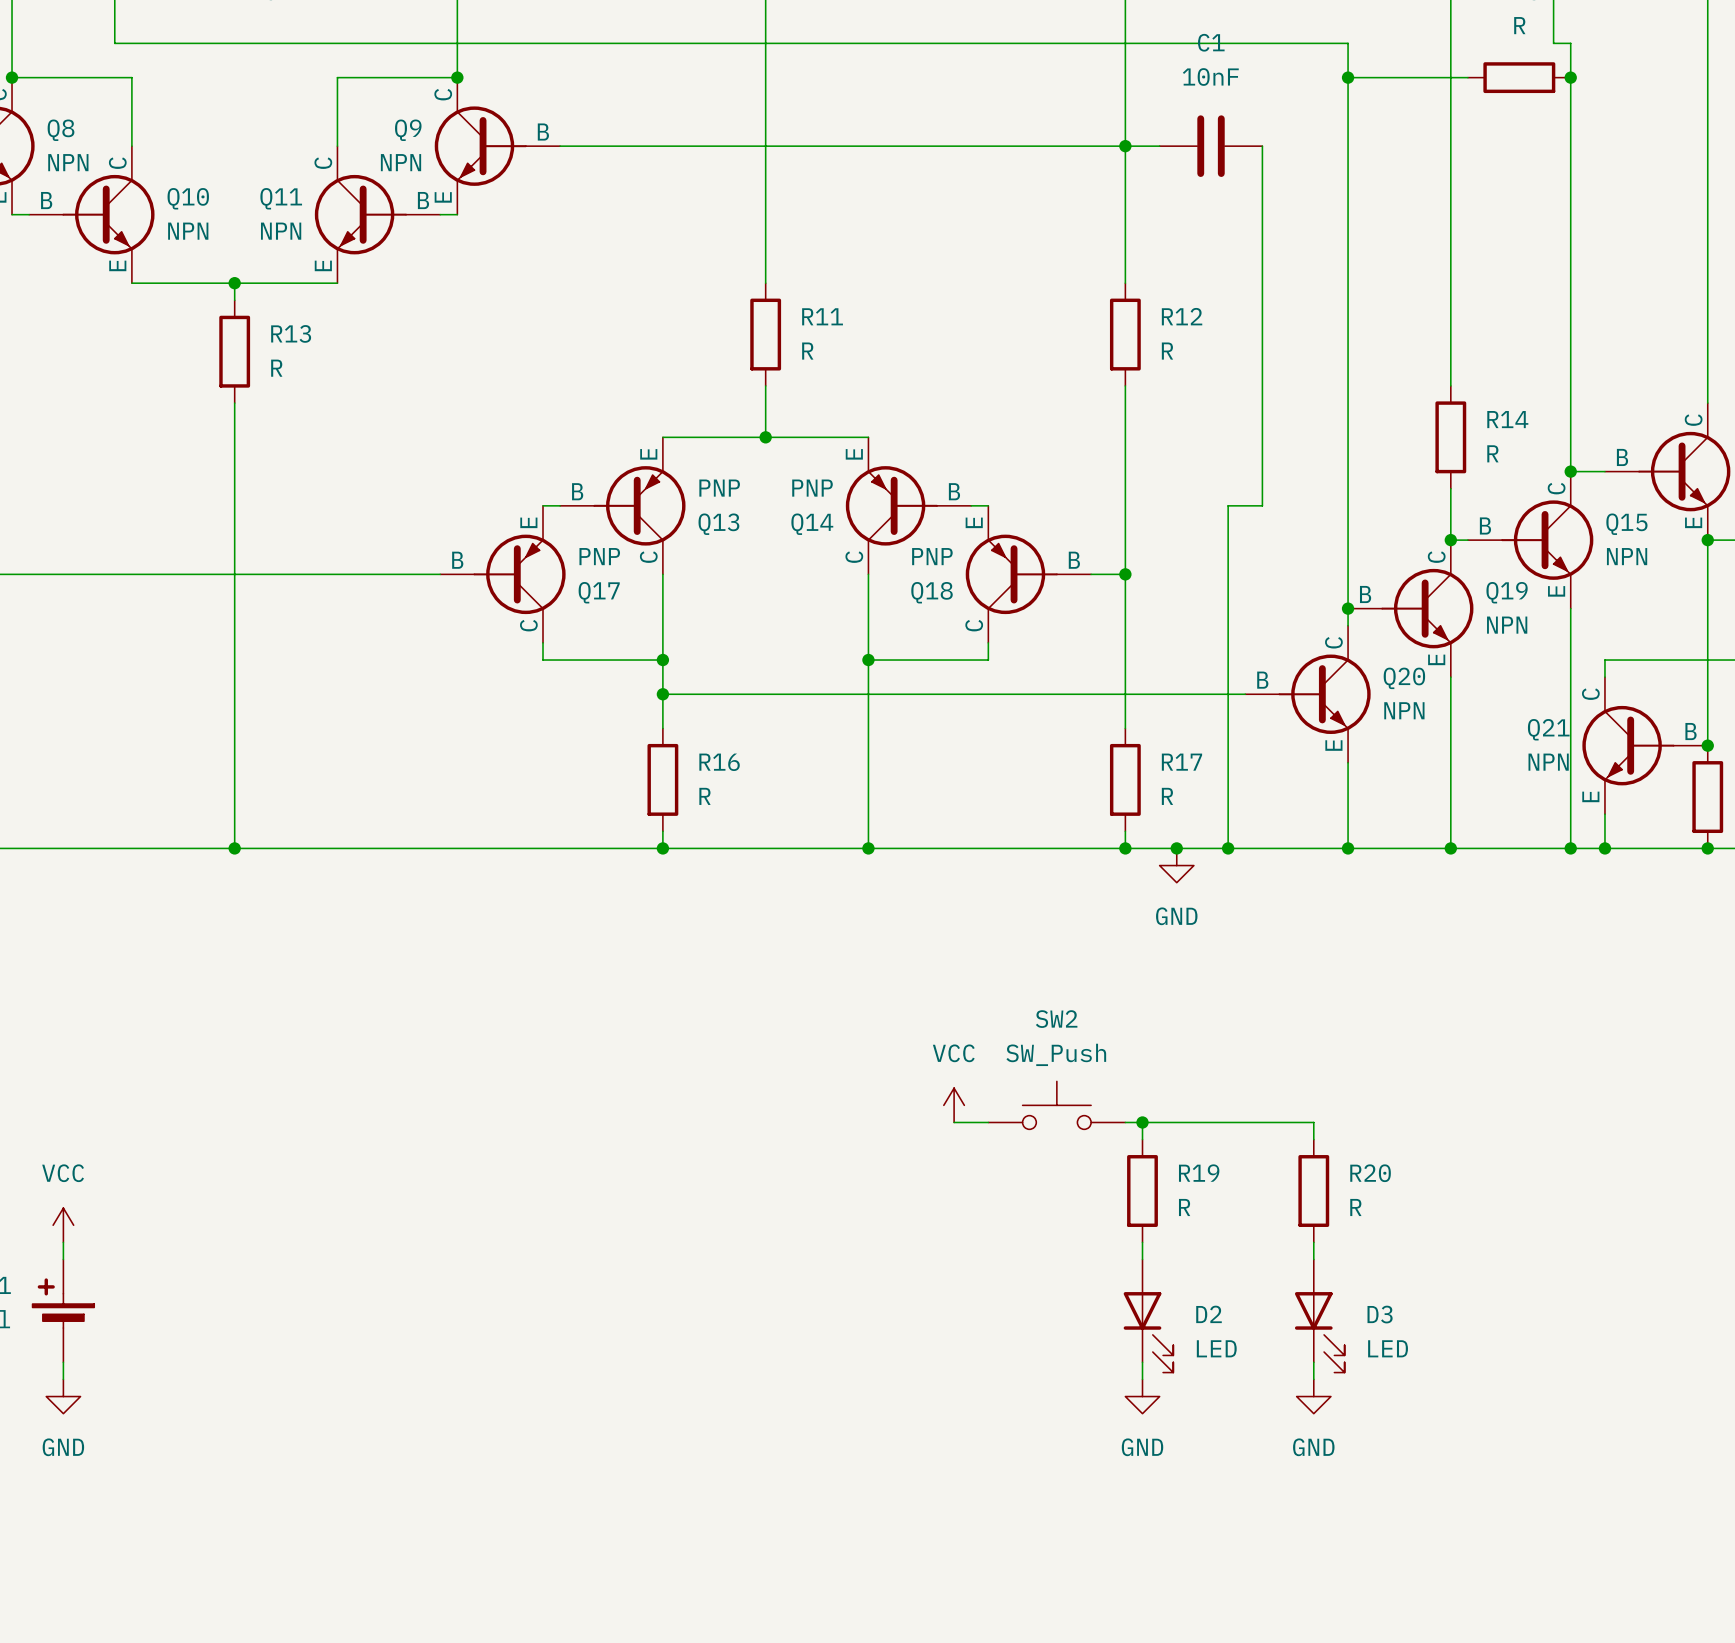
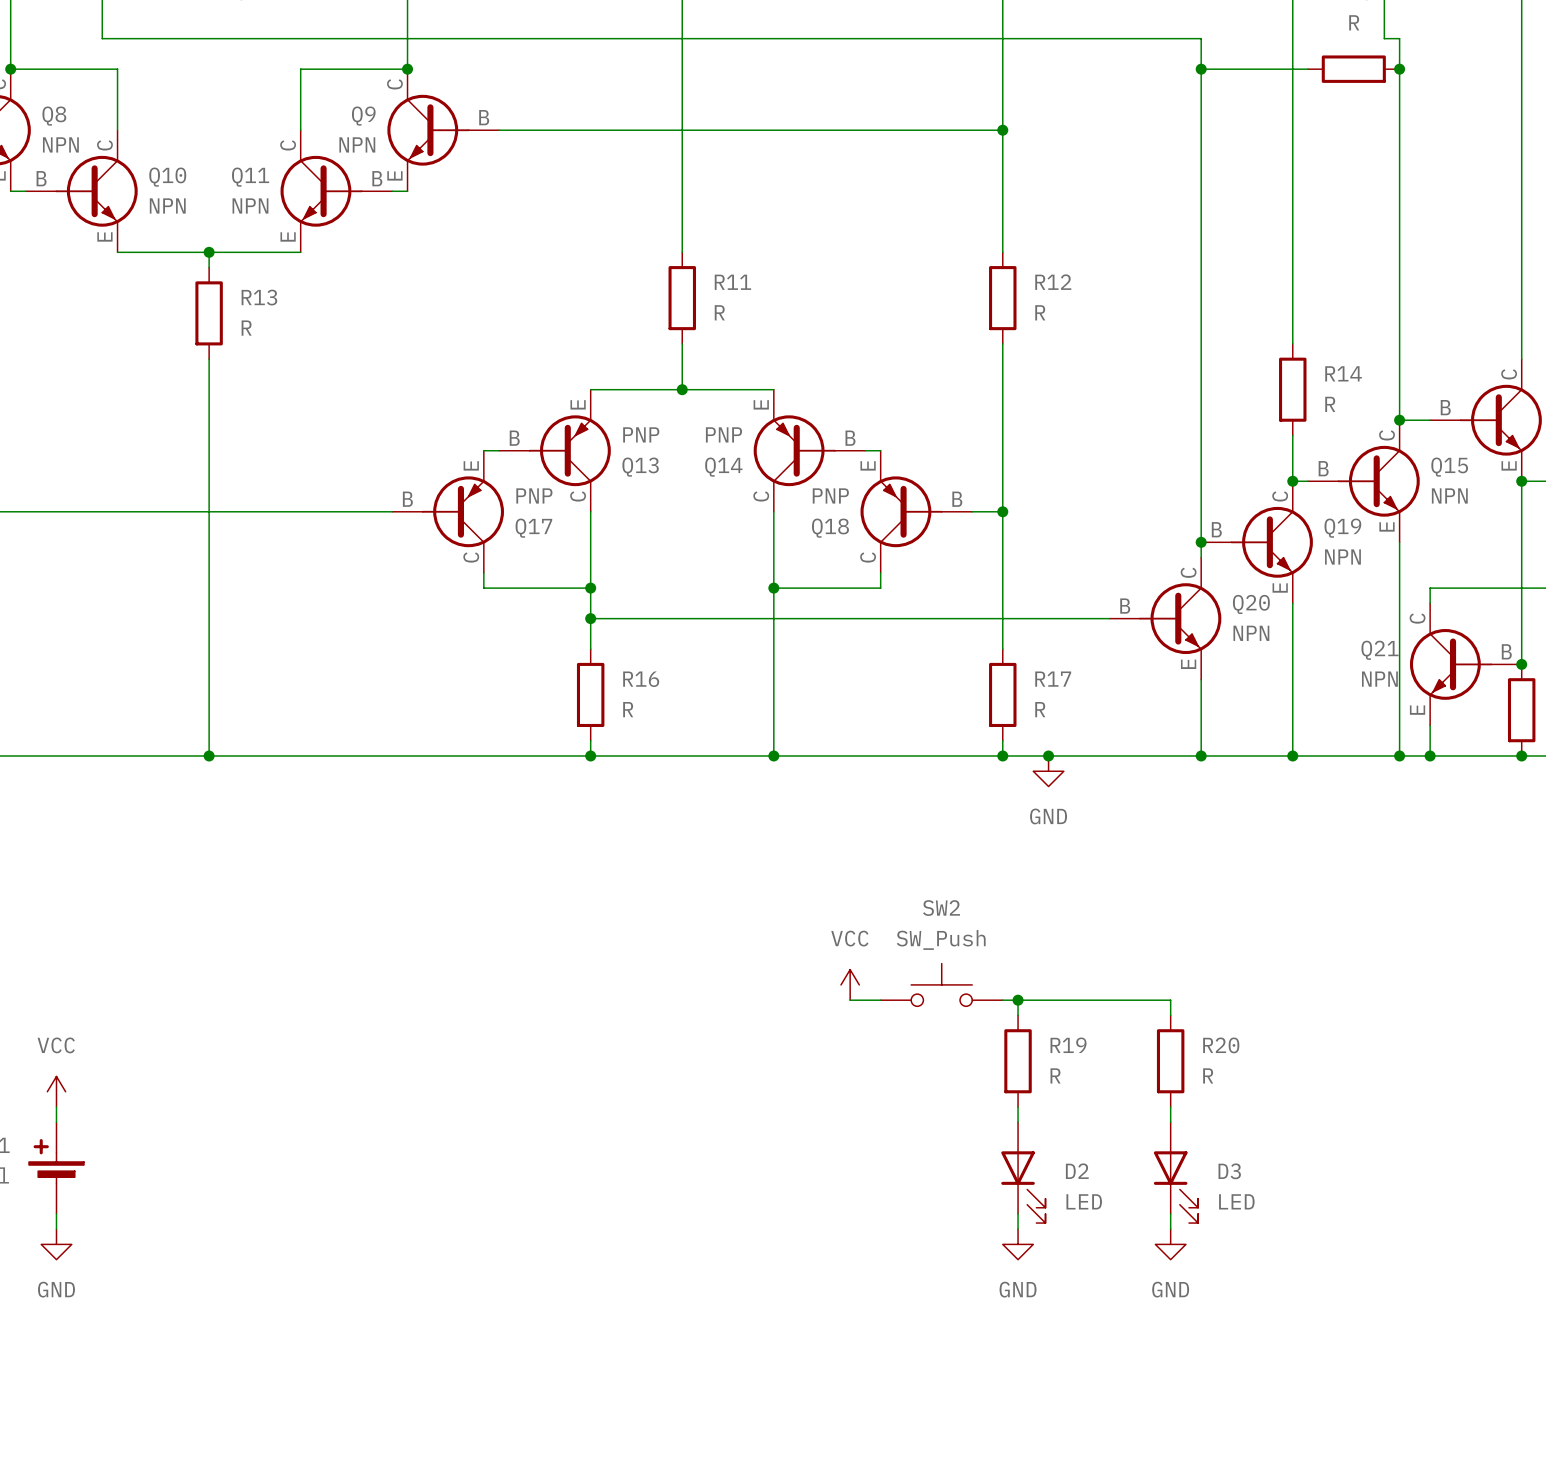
wire: (1125, 146) (1159, 146) -> none
C1: 10nF (1211, 146) -> none
wire: (1262, 146) (1262, 505) (1228, 505) (1228, 848) -> none
junction: (1228, 848) -> none

